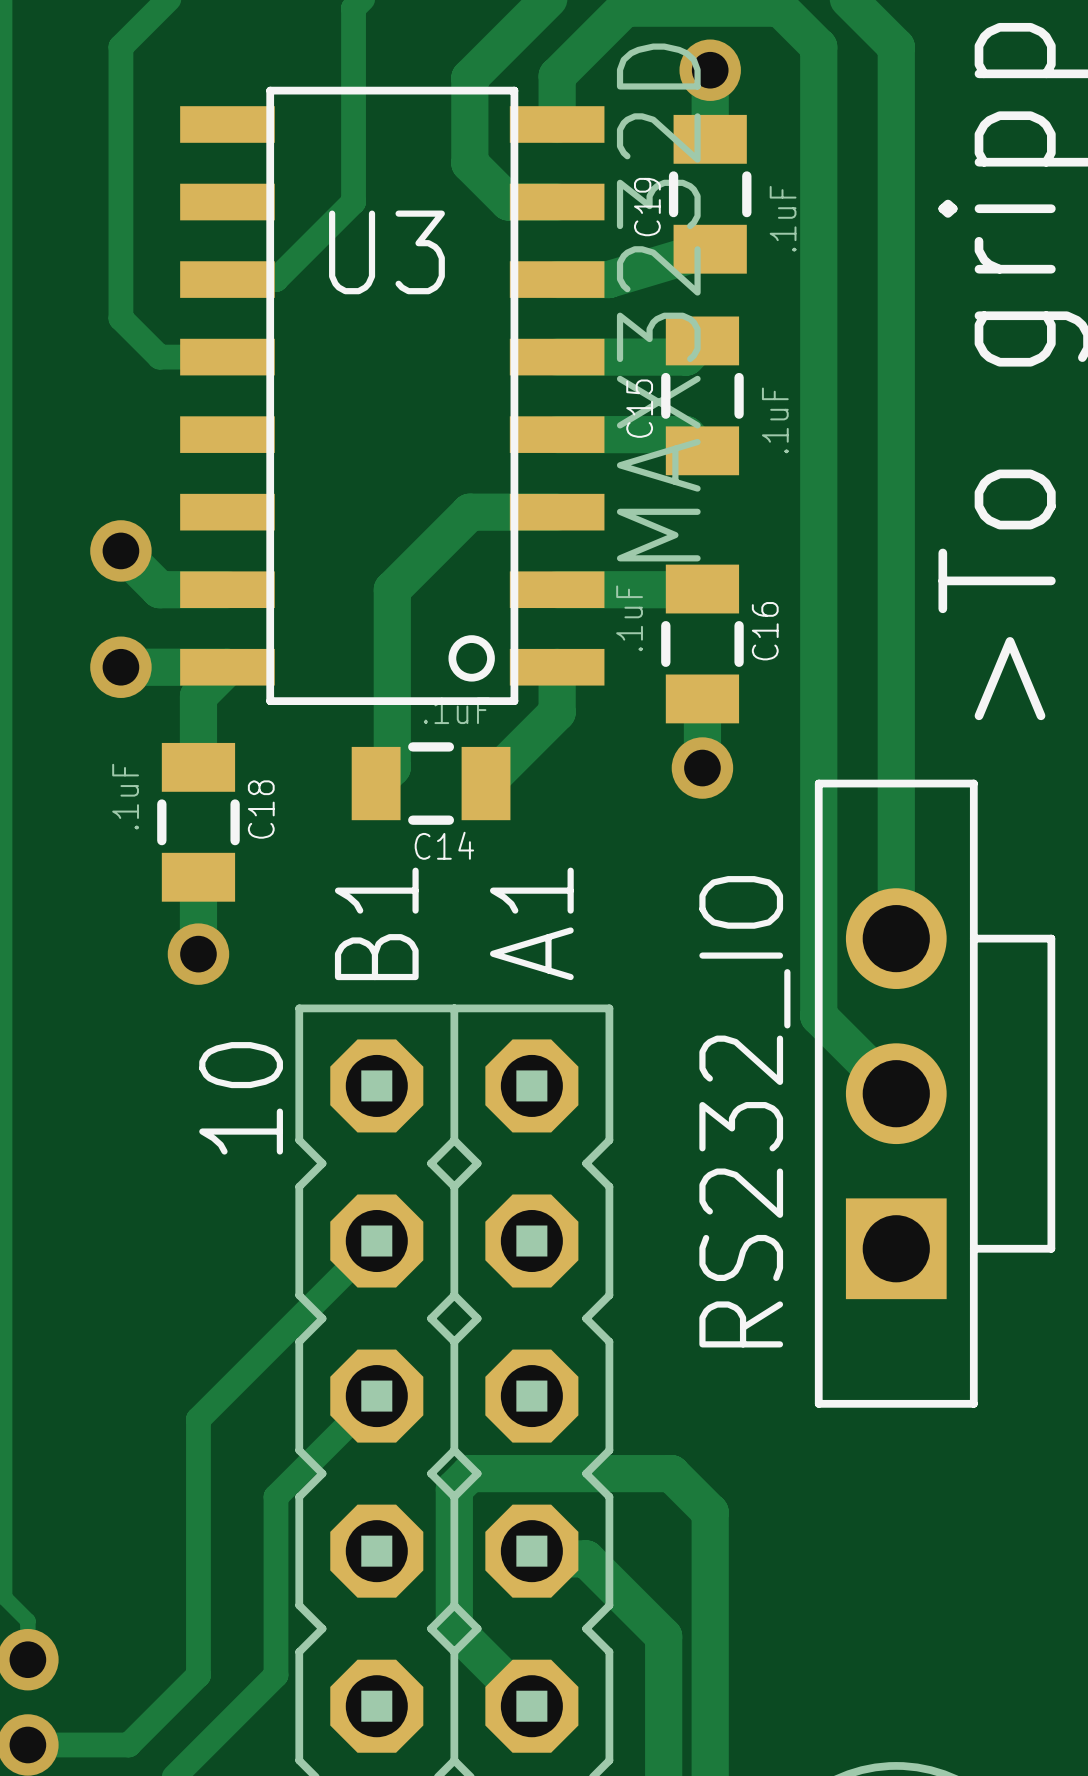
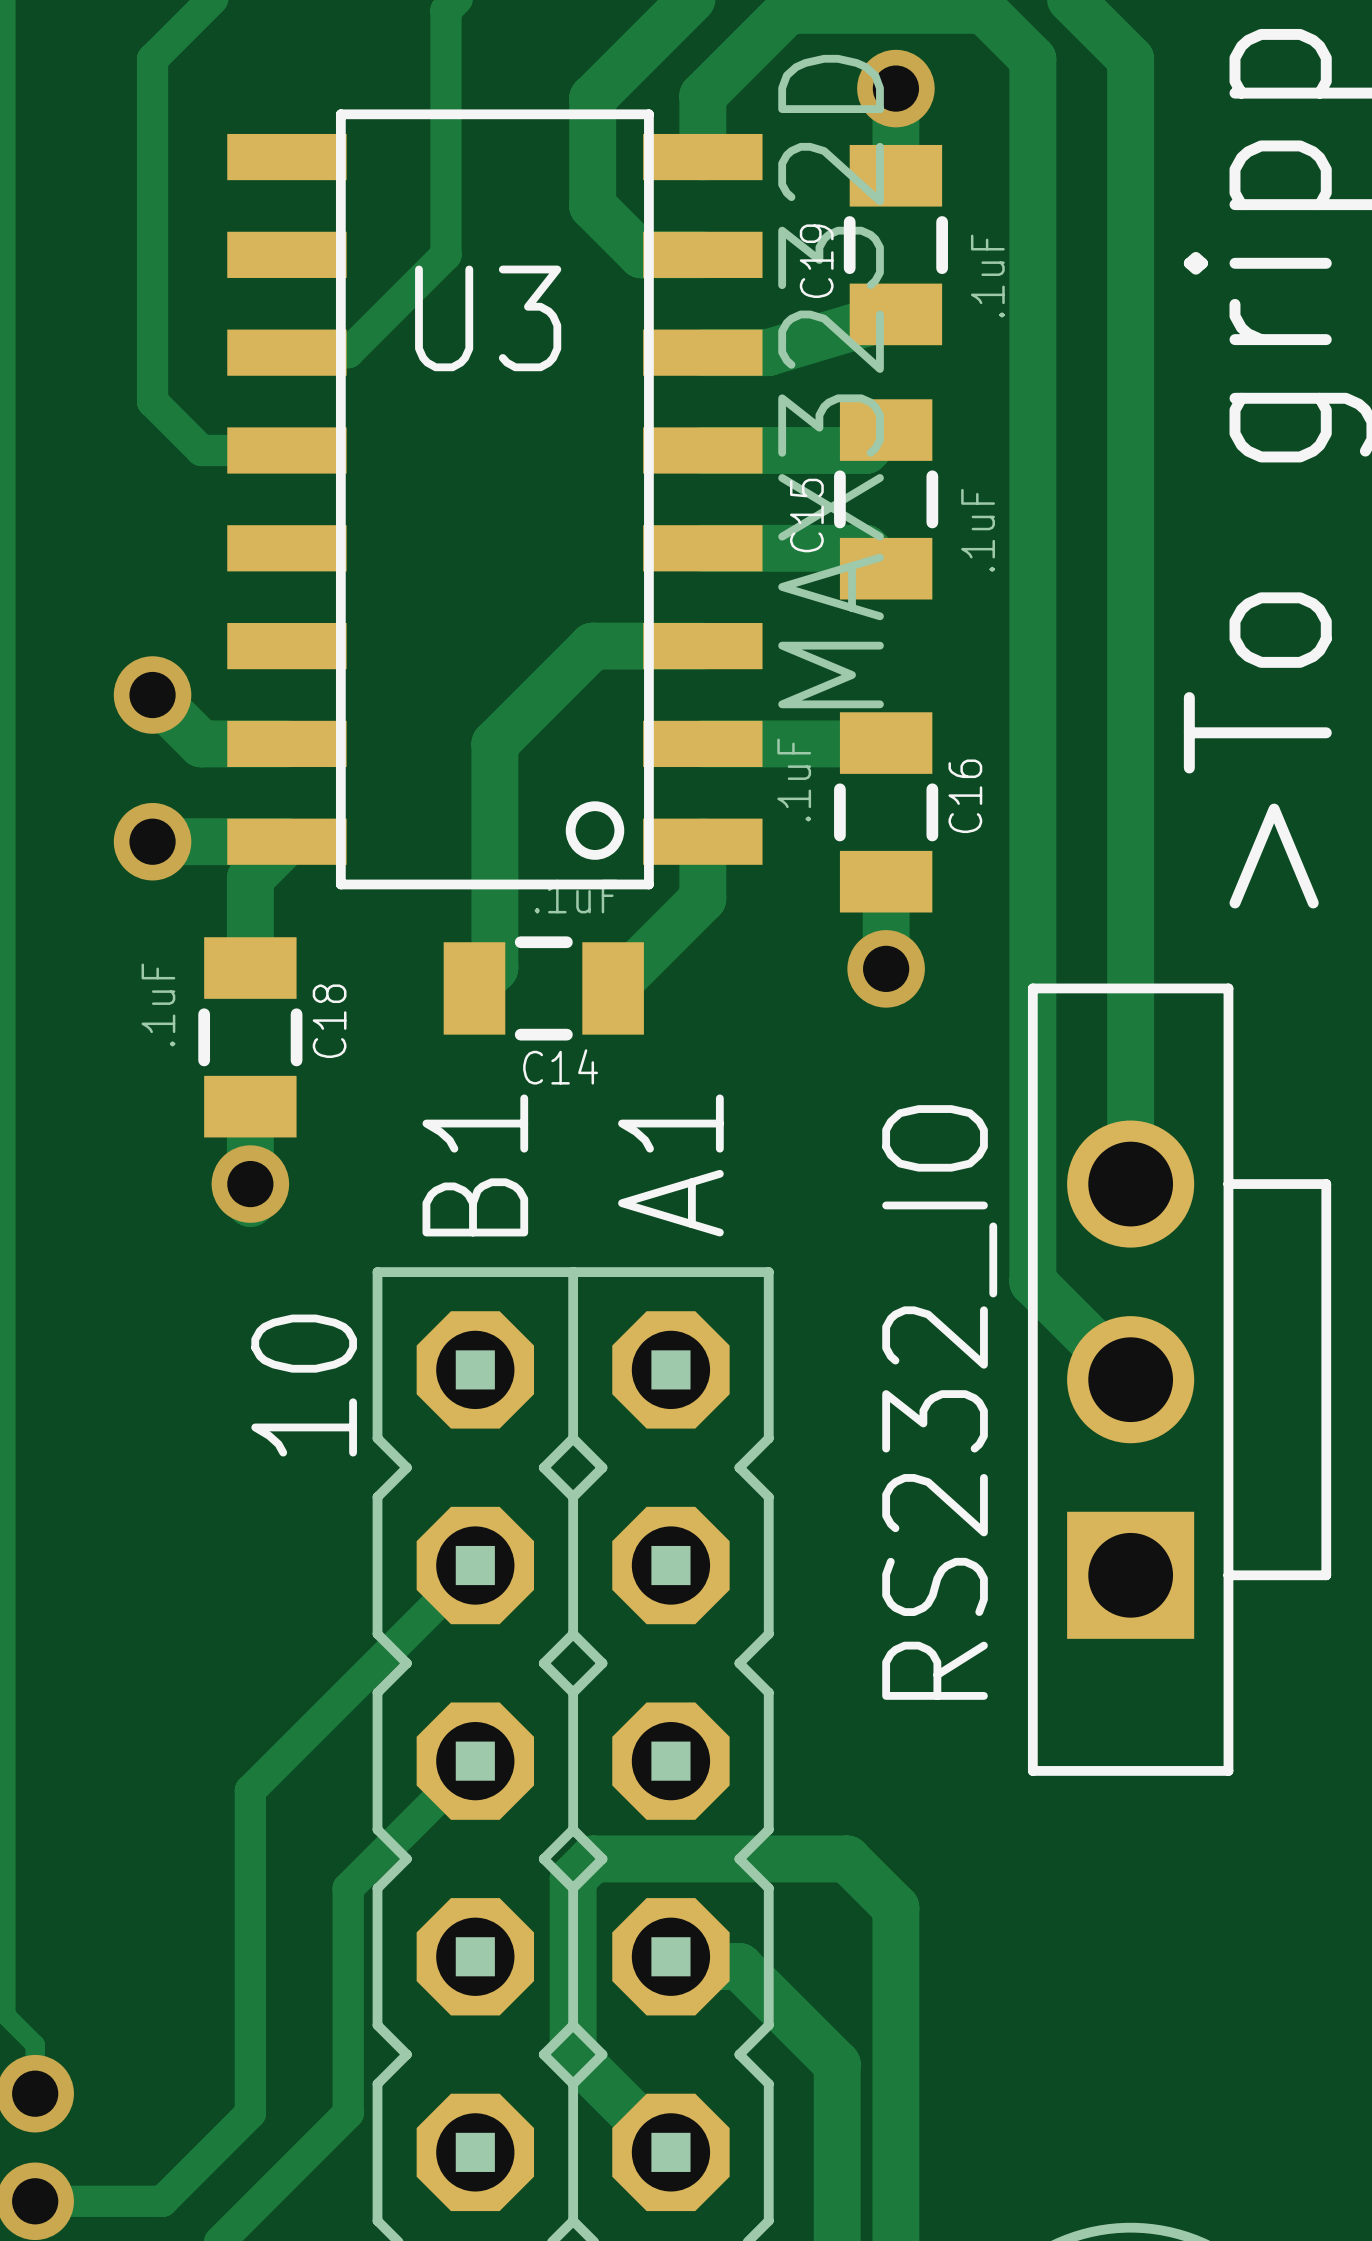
via position: (198, 954) -> (250, 1184)

